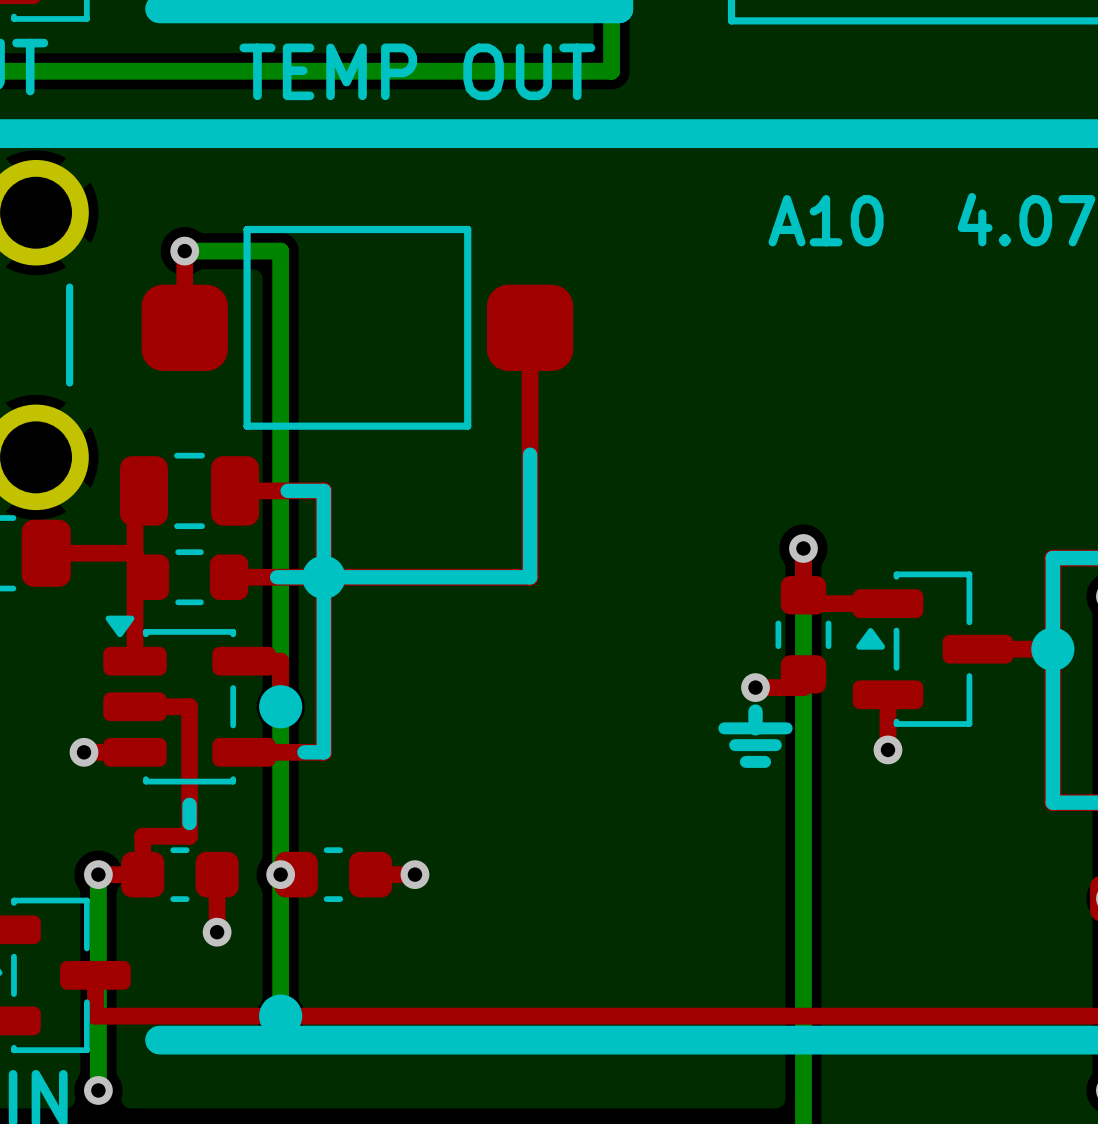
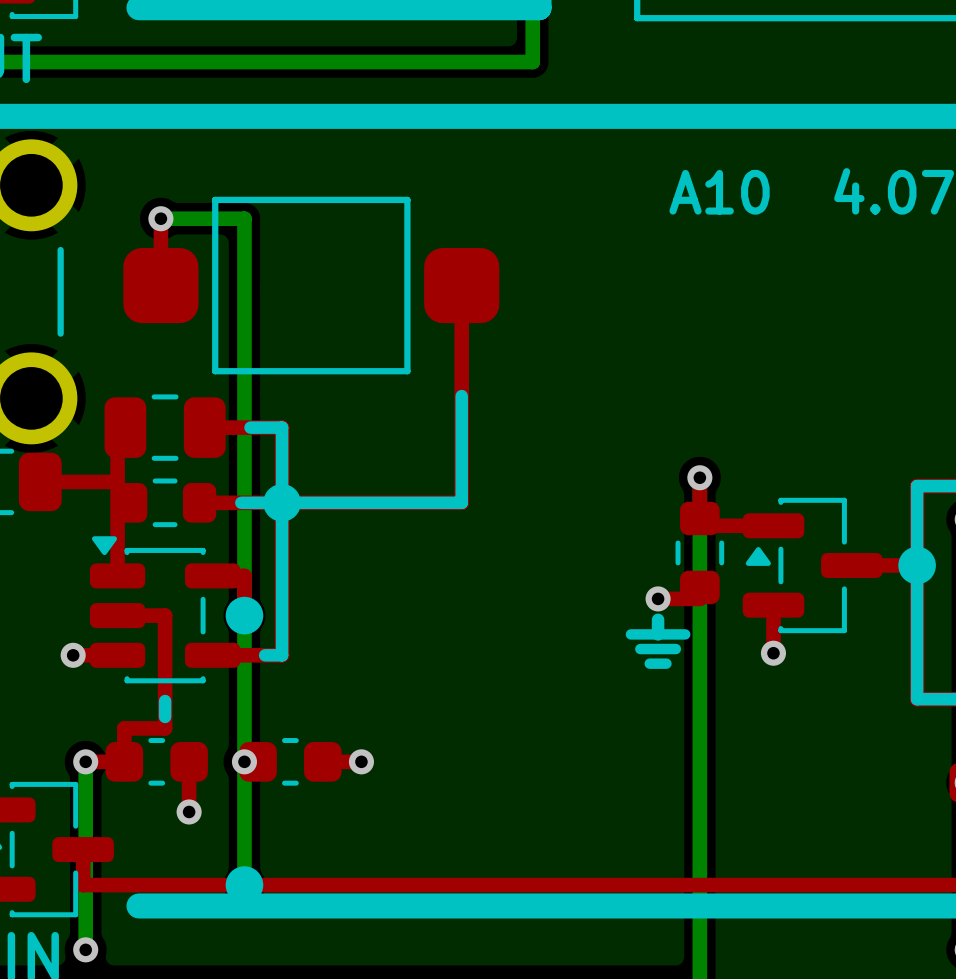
text: TEMP OUT (417, 71) -> none

